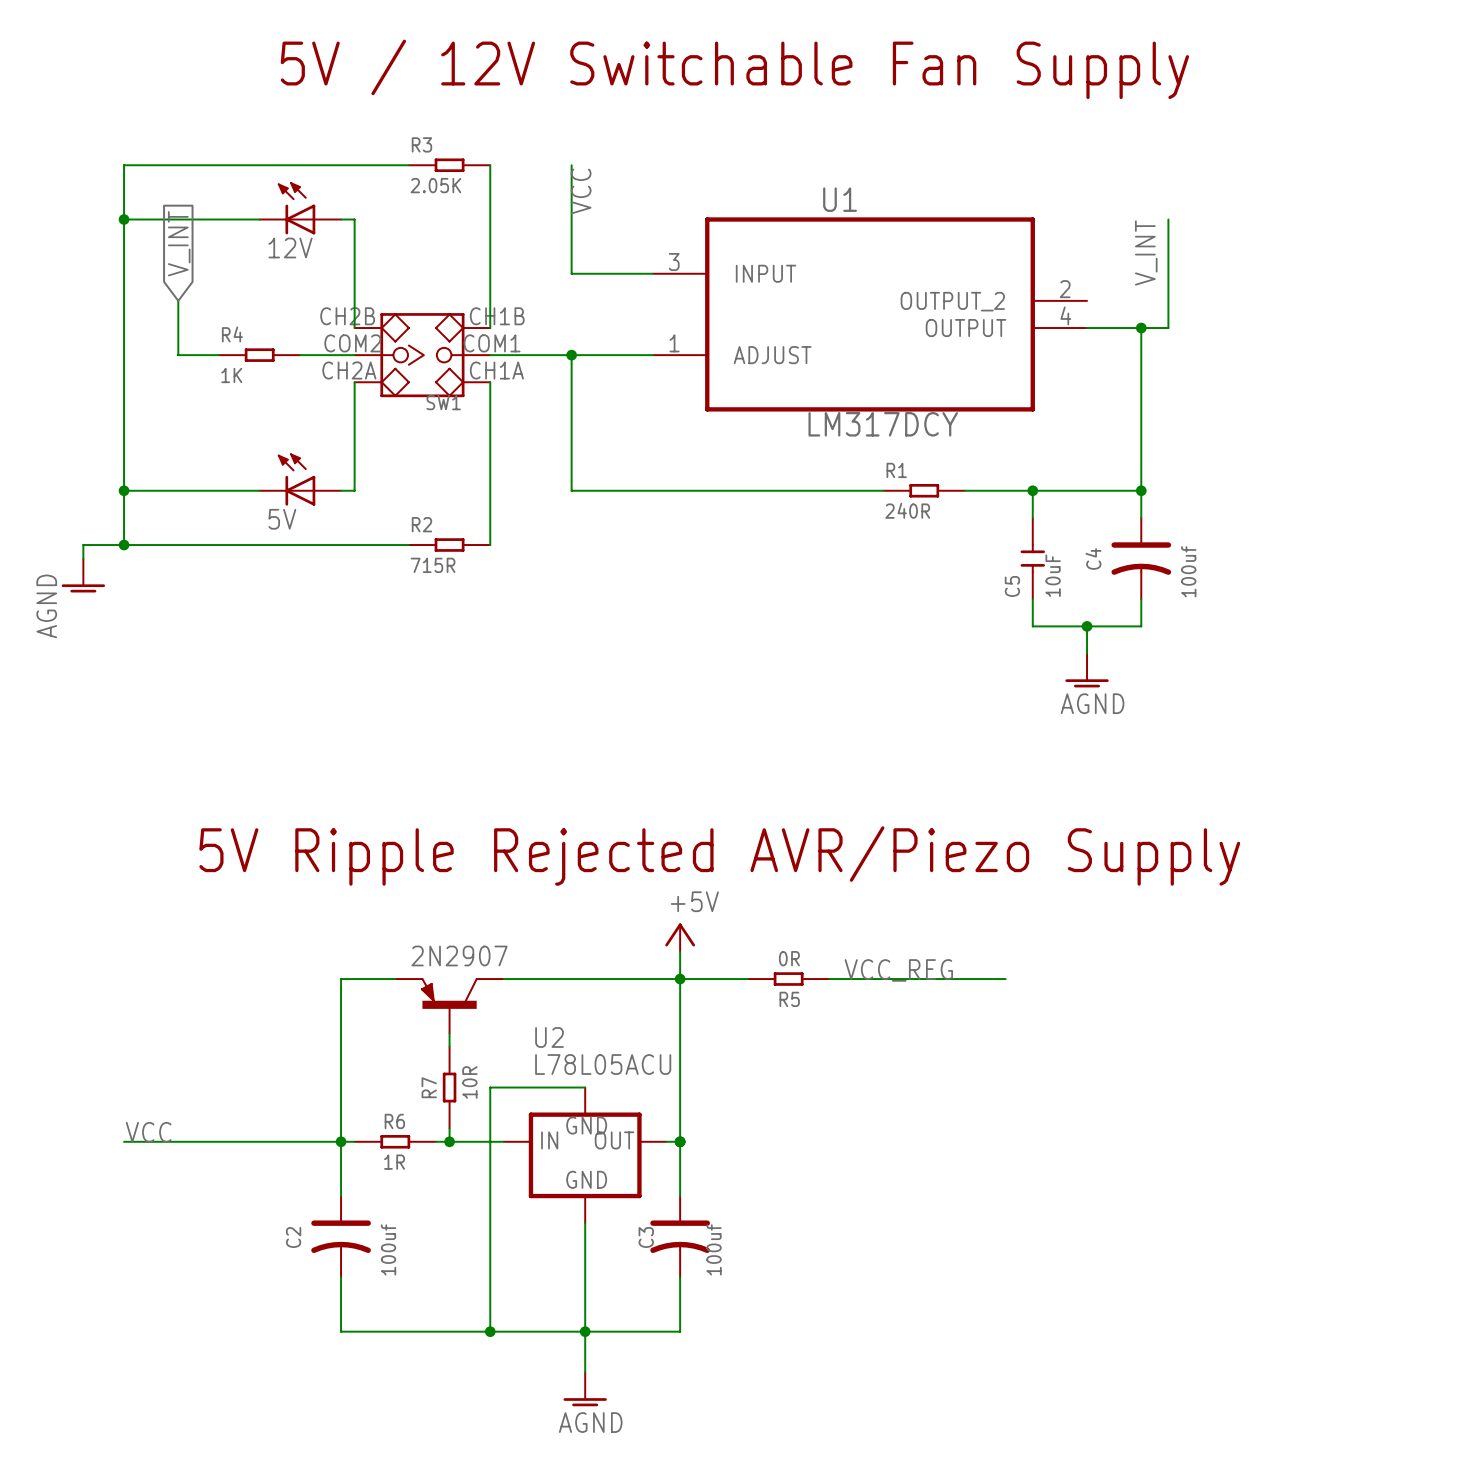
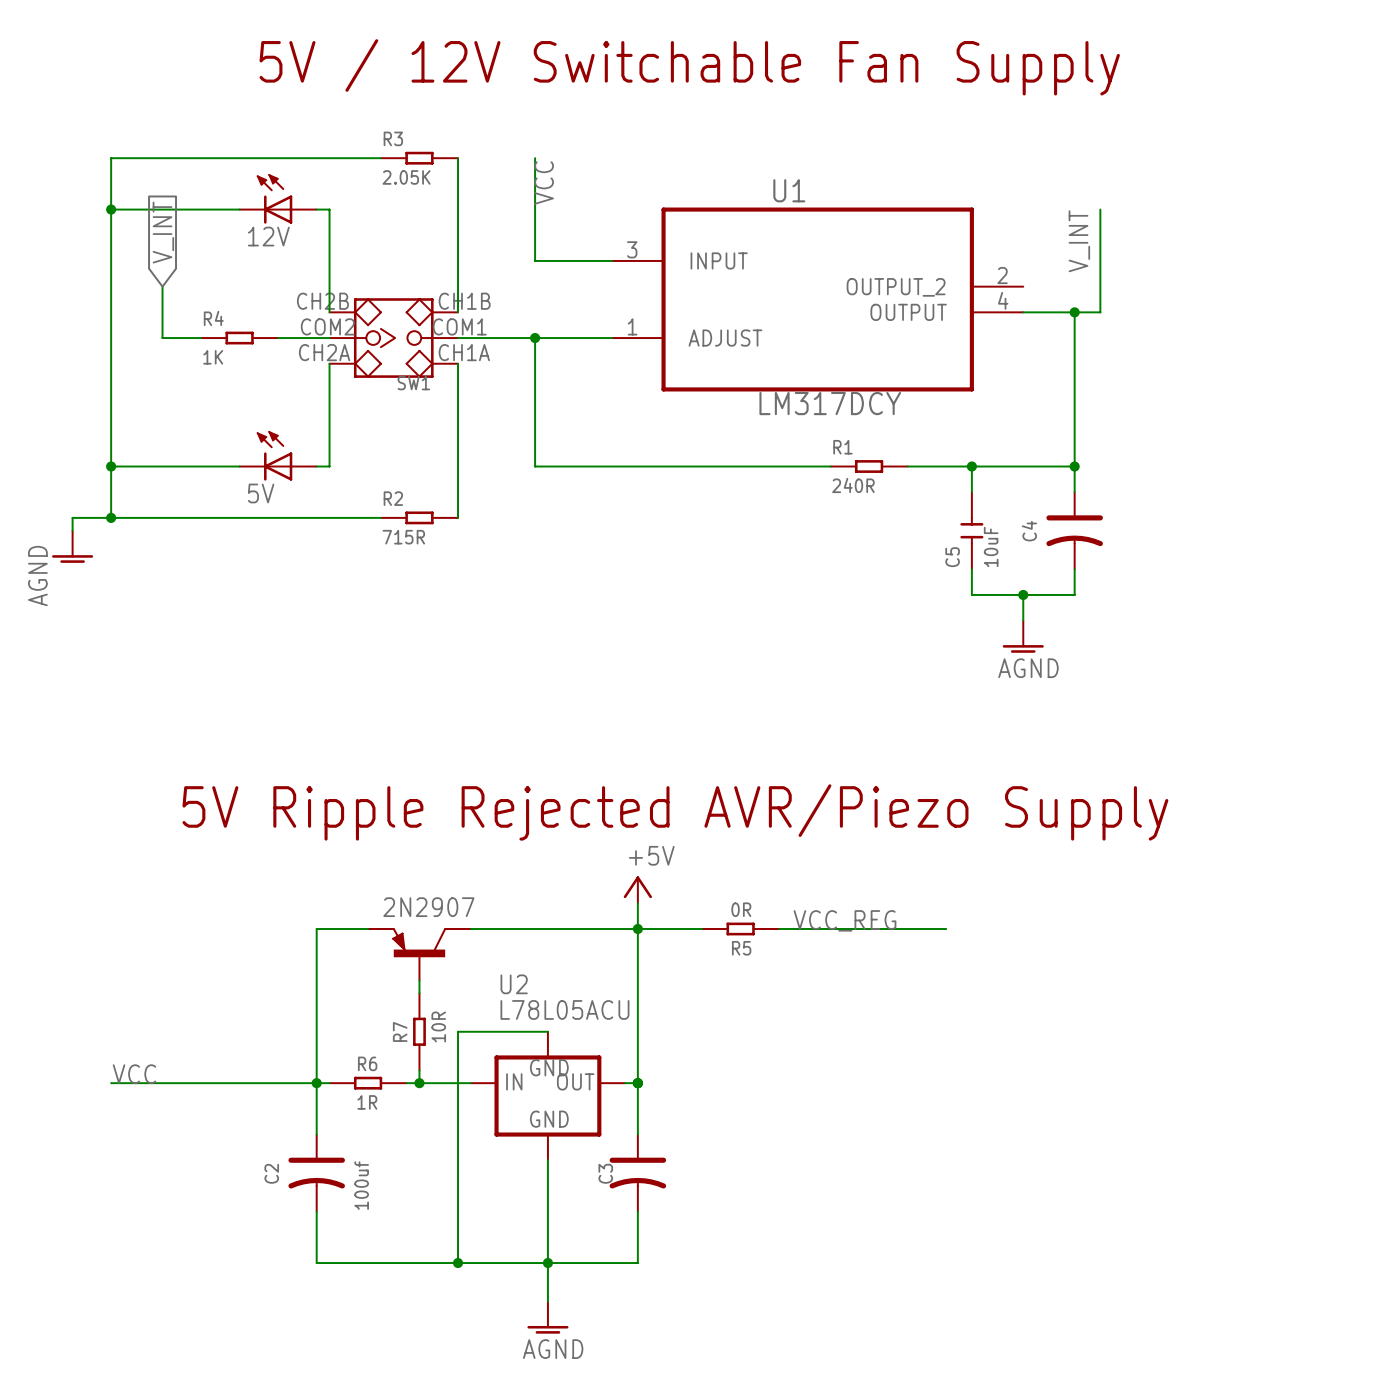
C4 value: 100uf (1188, 571) -> none
C3 value: 100uf (714, 1249) -> none

